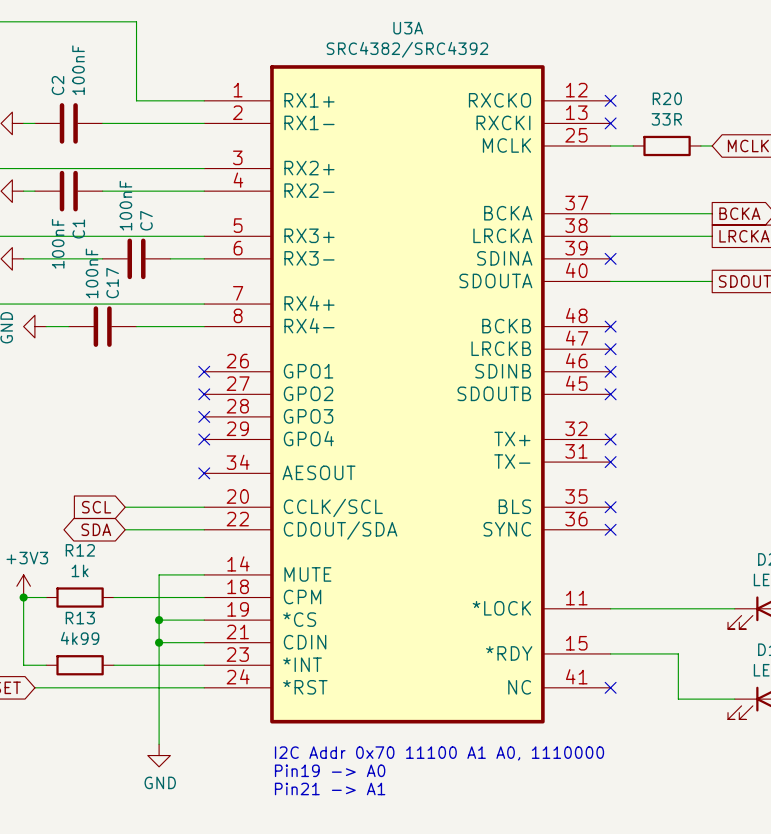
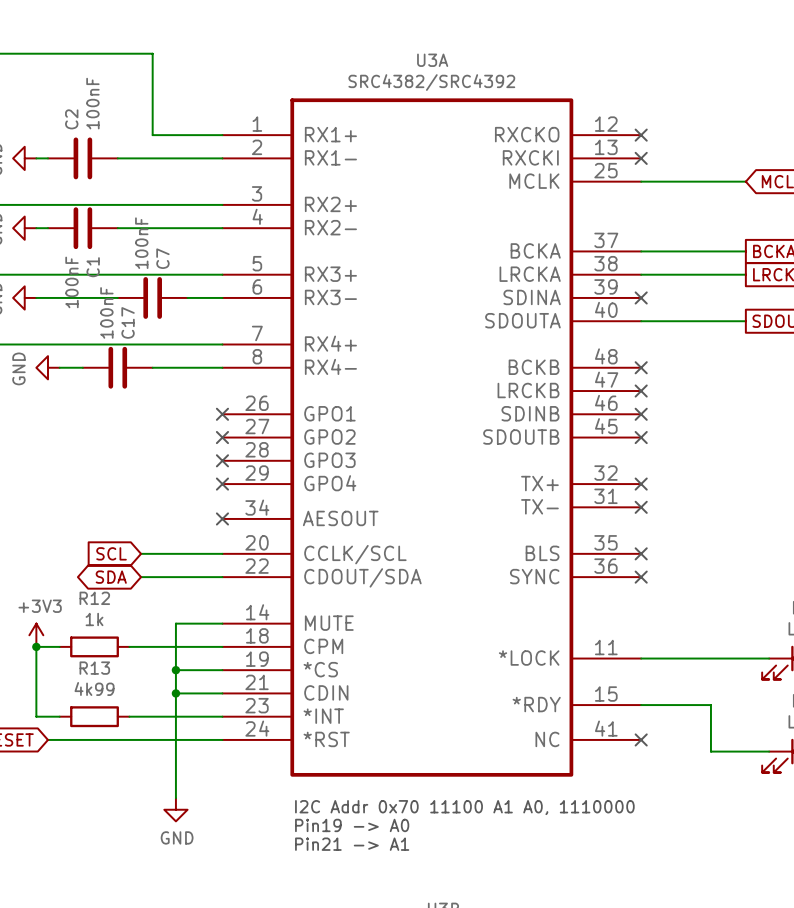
wire: none -> (664, 181) (734, 181)
R20: 33R (667, 145) -> none

